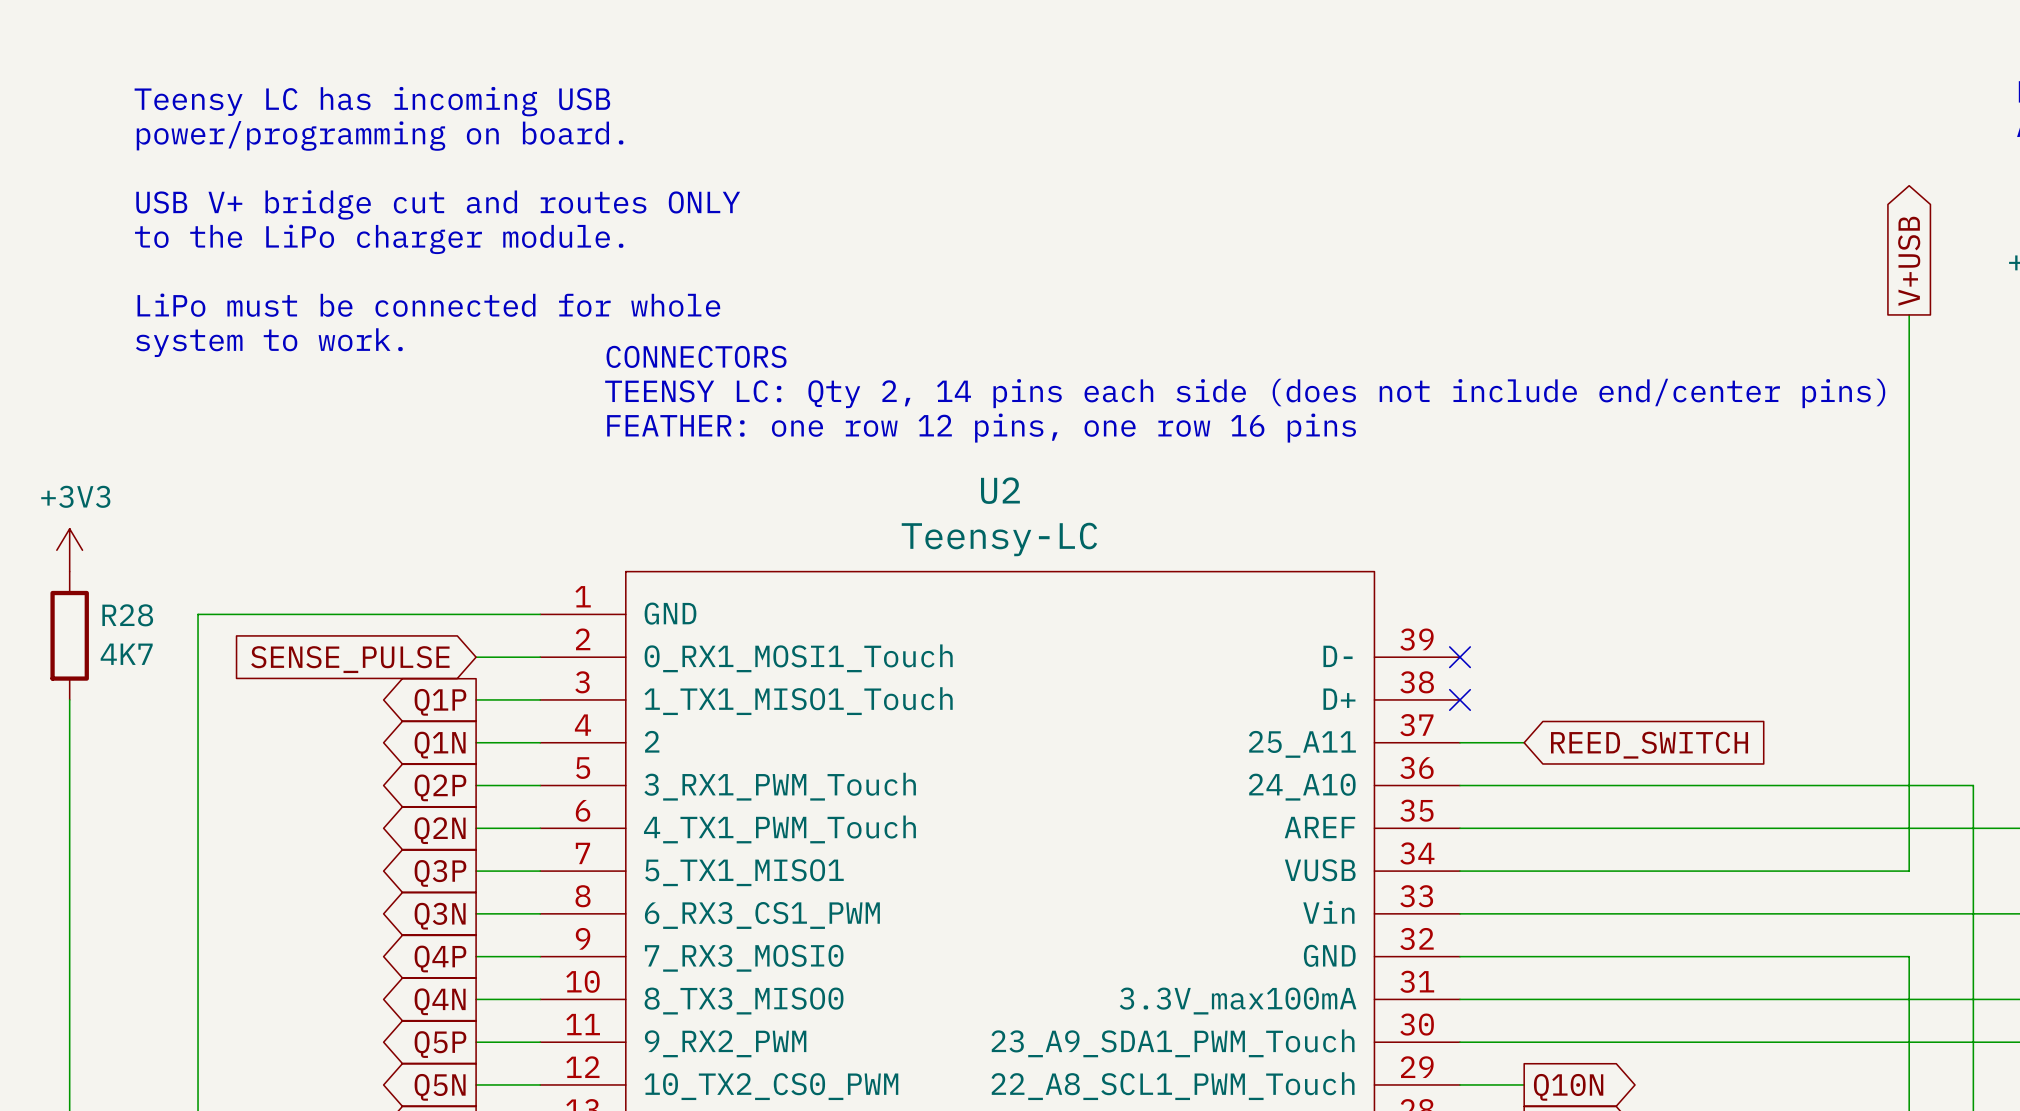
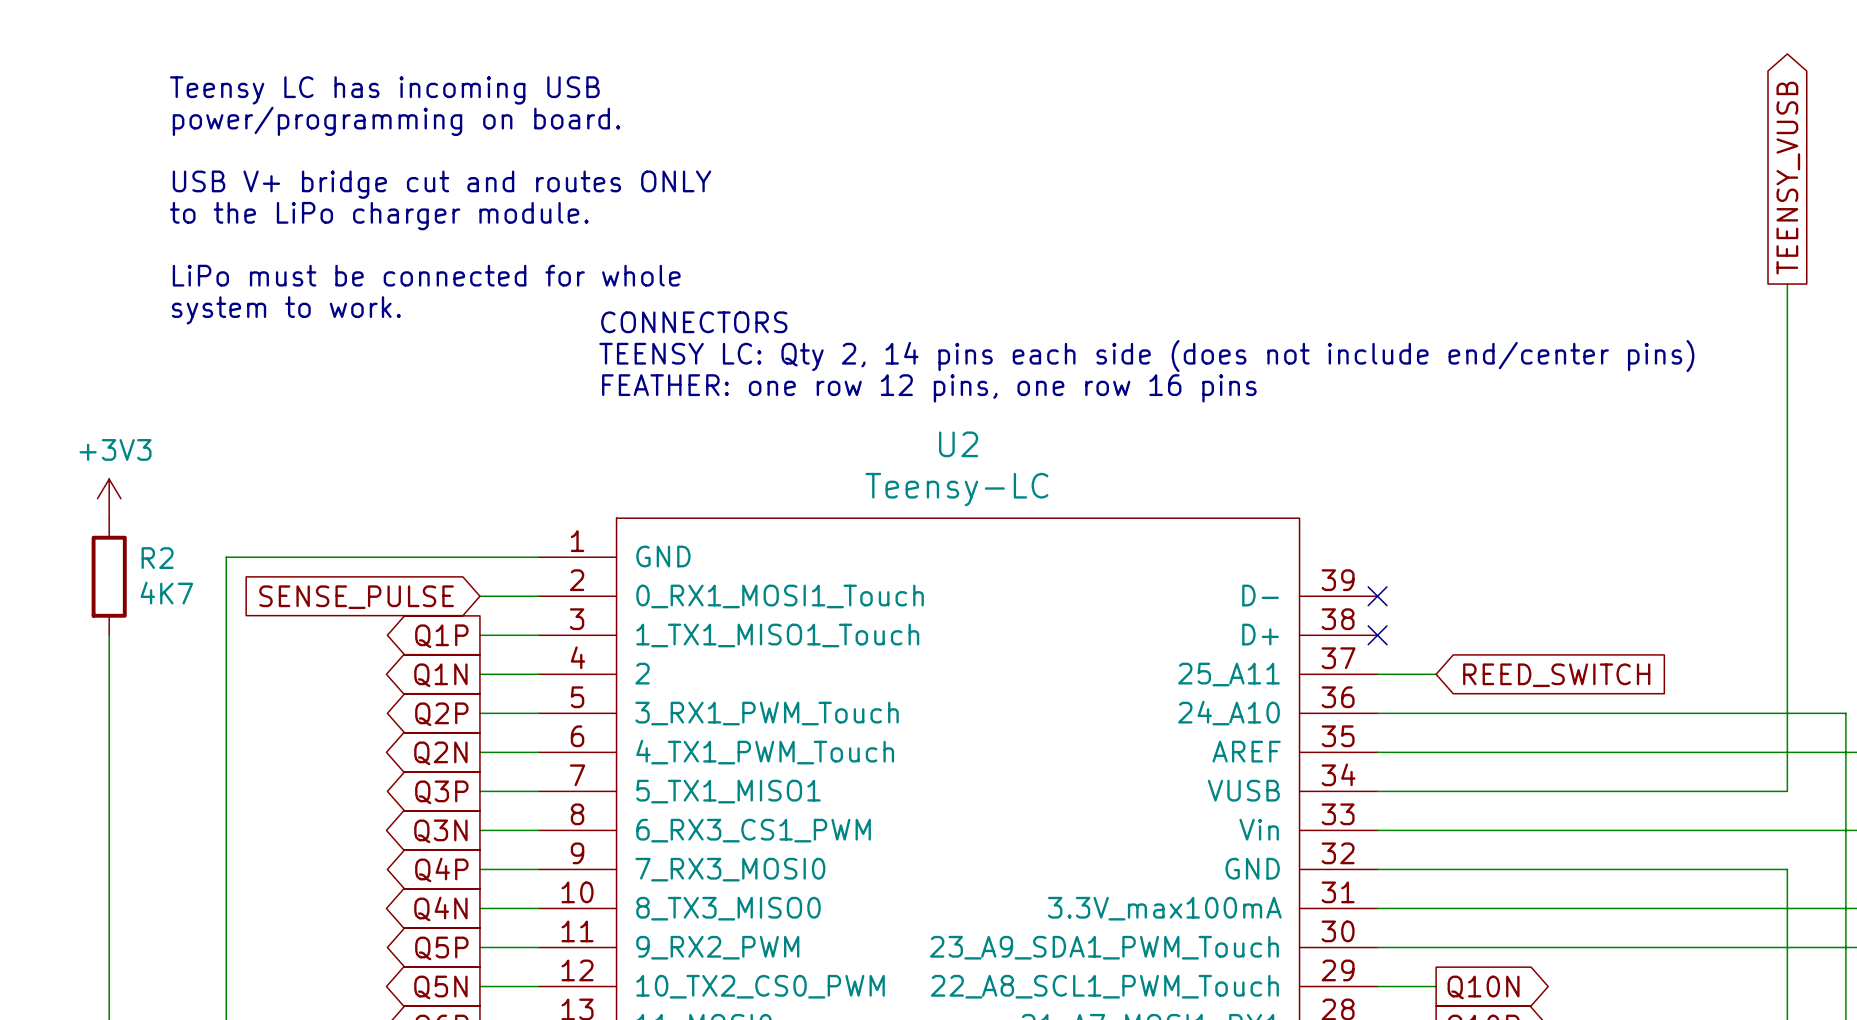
global label: V+USB (1909, 261) -> TEENSY_VUSB (1788, 178)
R28 name: R28 (127, 615) -> R2 (157, 558)

